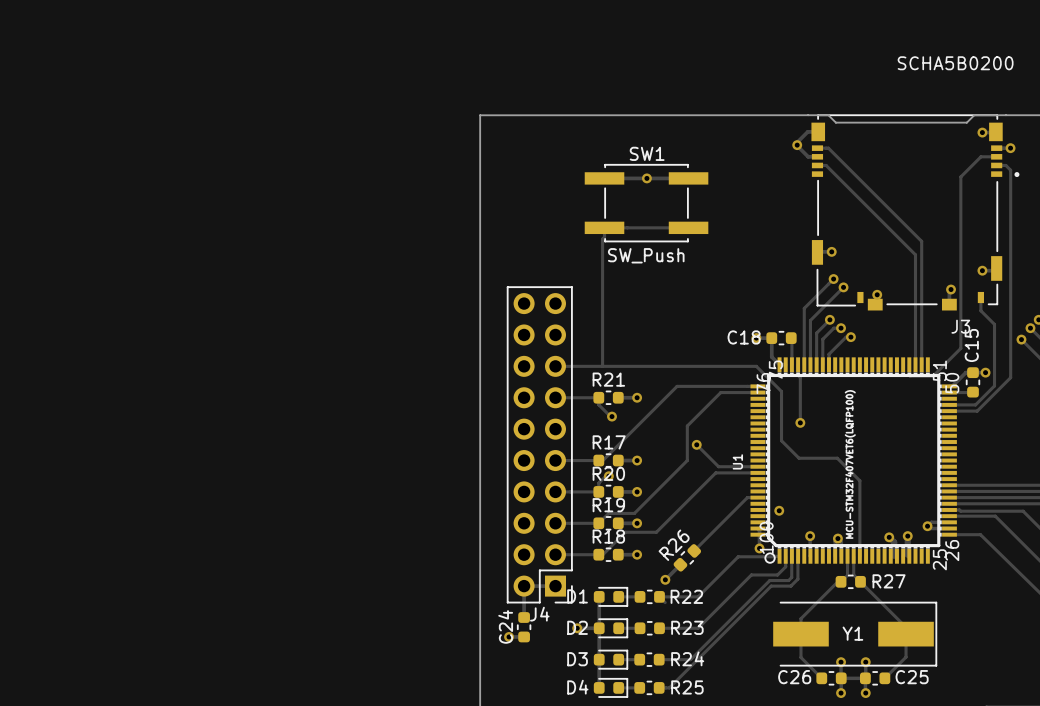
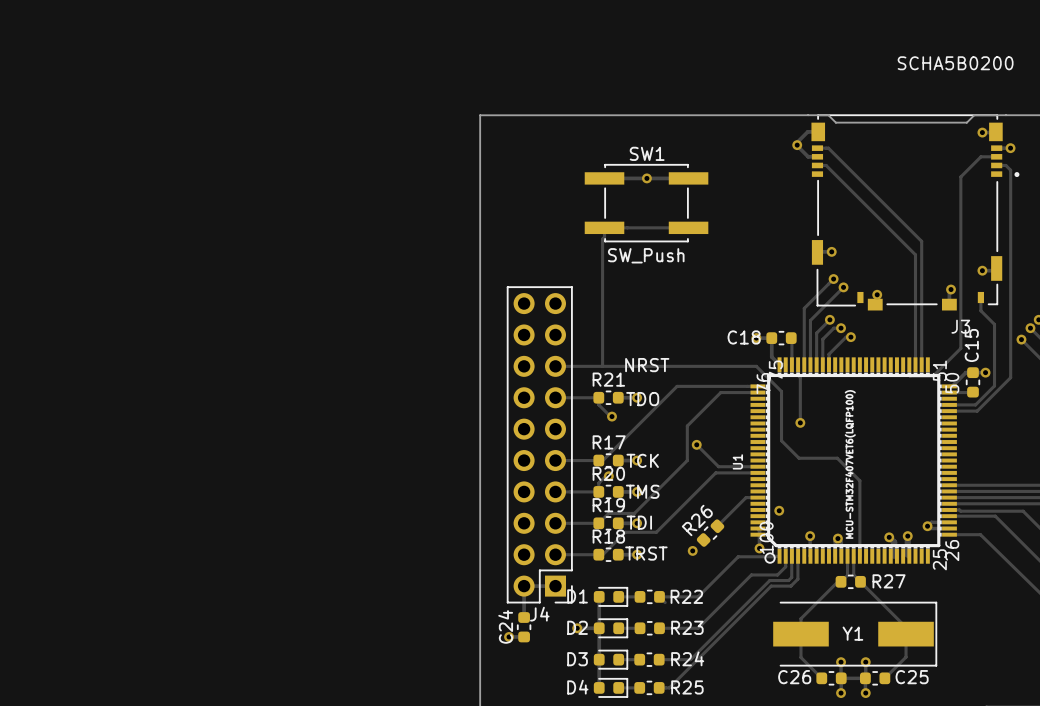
text: none -> NRST (647, 365)
text: none -> TDO (642, 399)
text: none -> TCK (642, 460)
text: none -> TMS (642, 491)
track: (747, 497) (694, 550) -> (747, 497) (717, 526)
text: none -> TDI (639, 522)
text: none -> TRST (646, 553)
R26 position: (687, 557) -> (710, 533)
track: (680, 564) (665, 579) -> none
via position: (665, 579) -> (692, 550)

